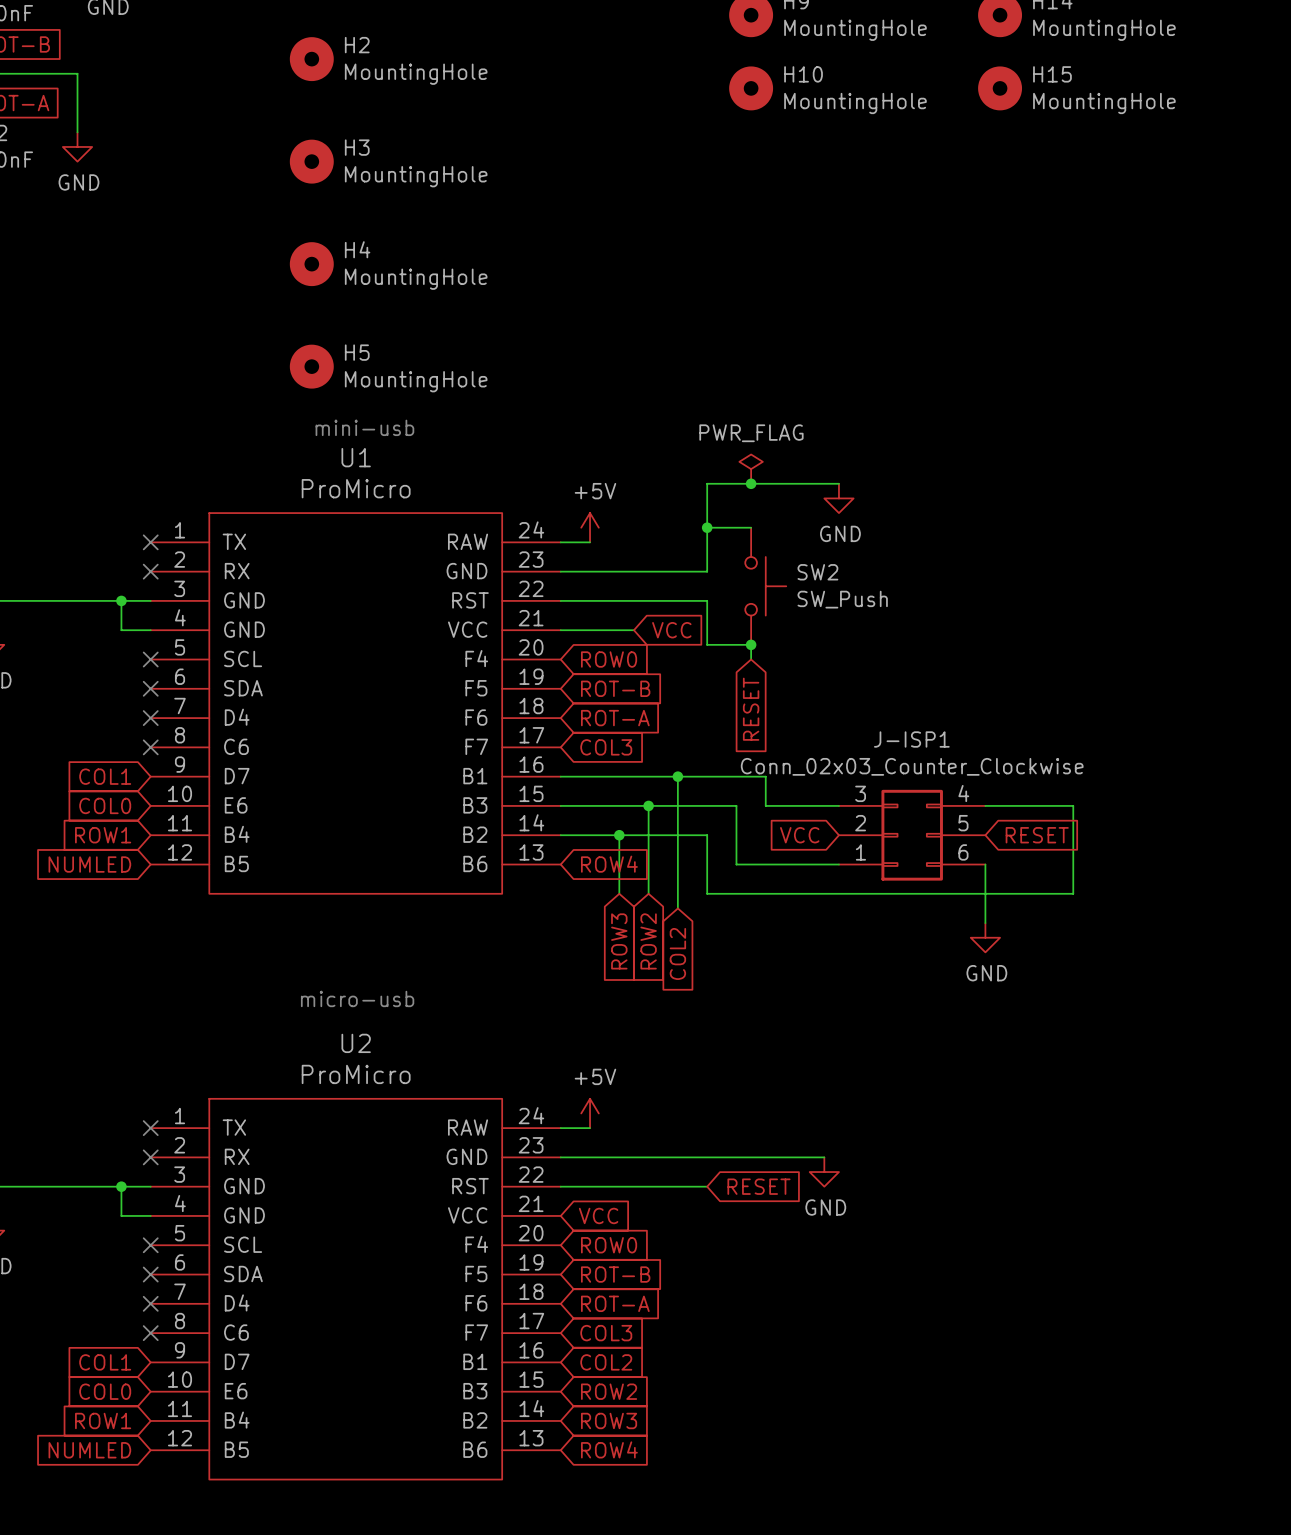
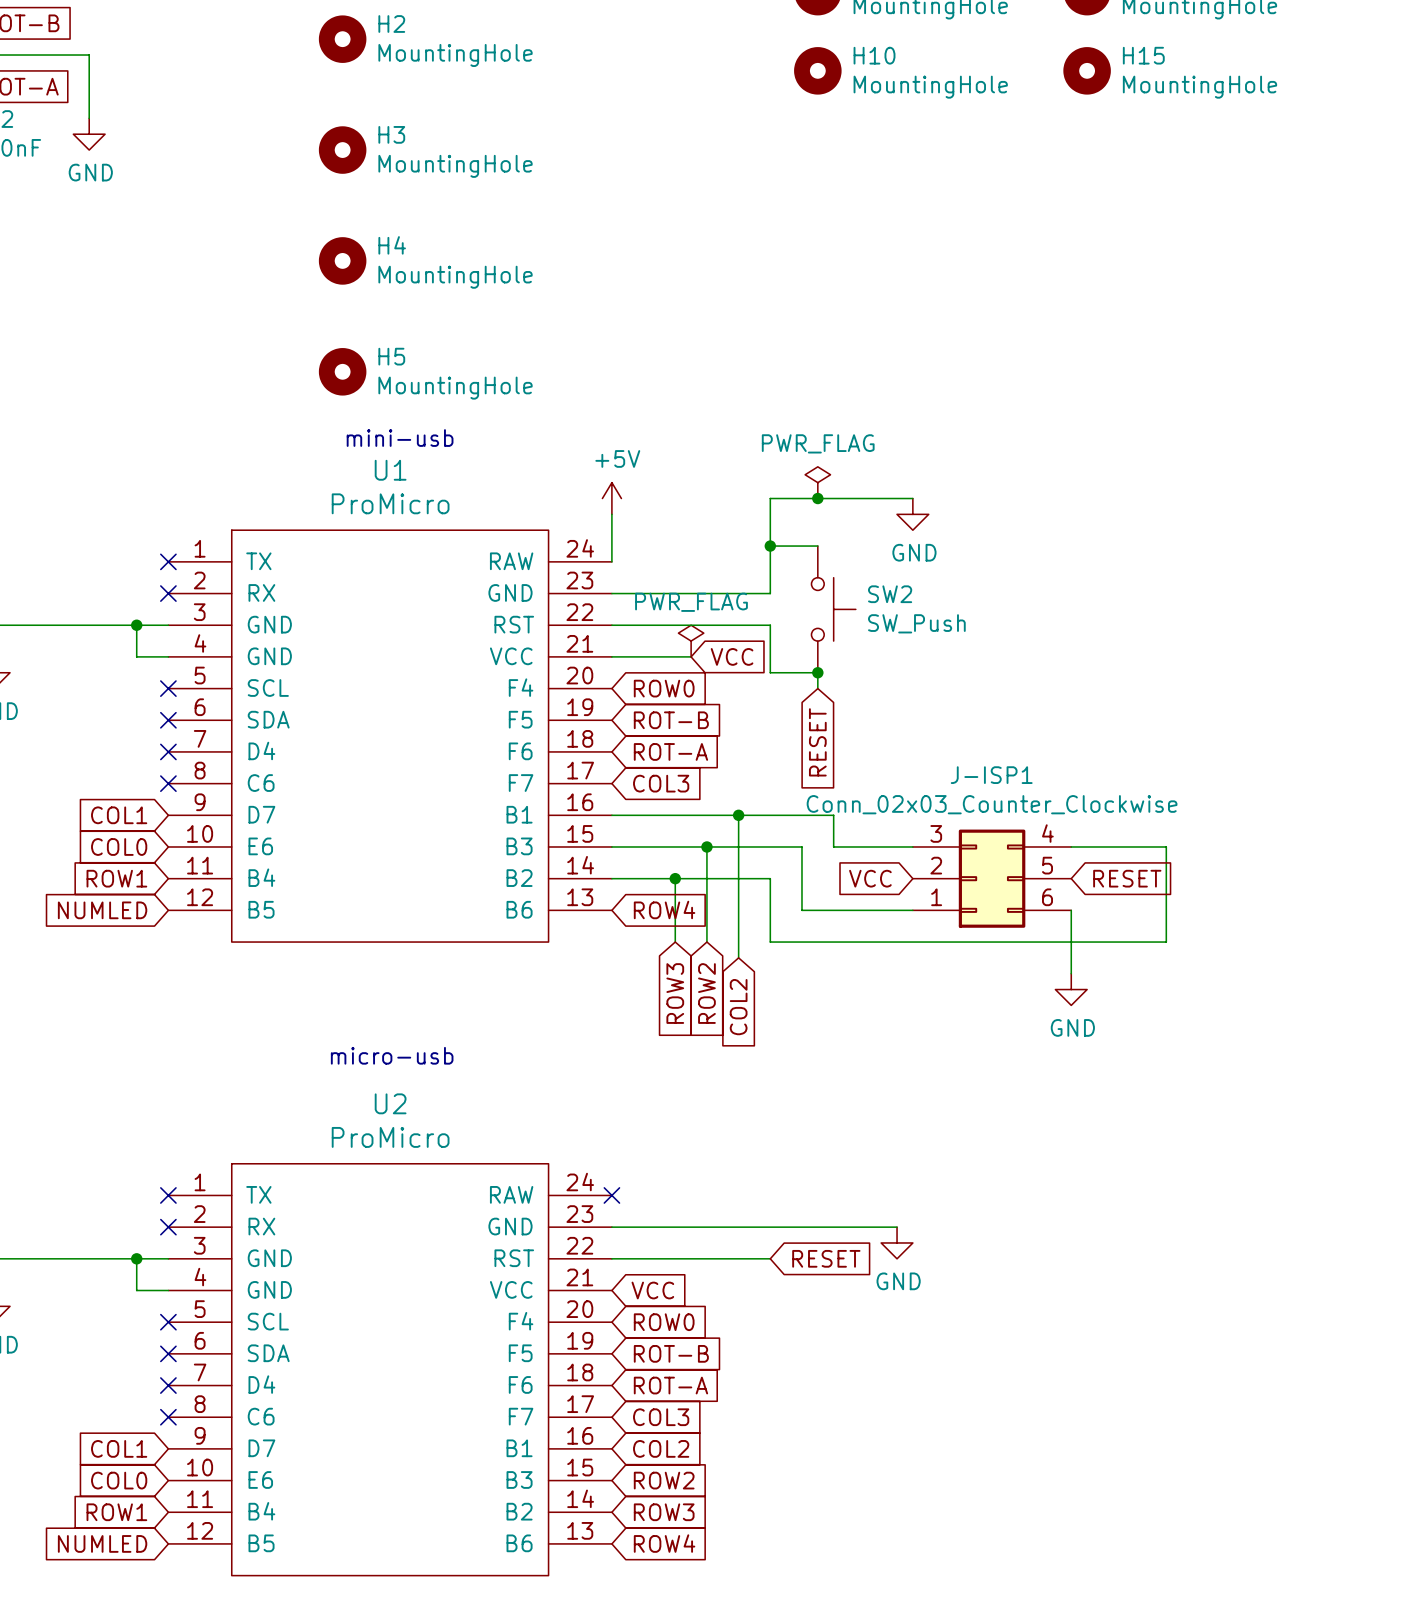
power symbol position: +5V (590, 527) -> +5V (611, 498)
wire: (560, 542) (590, 542) -> (611, 561) (611, 514)
power symbol: none -> PWR_FLAG (691, 641)
power symbol: +5V (590, 1113) -> none
wire: (560, 1128) (590, 1128) -> none
no-connect mark: none -> (611, 1195)

